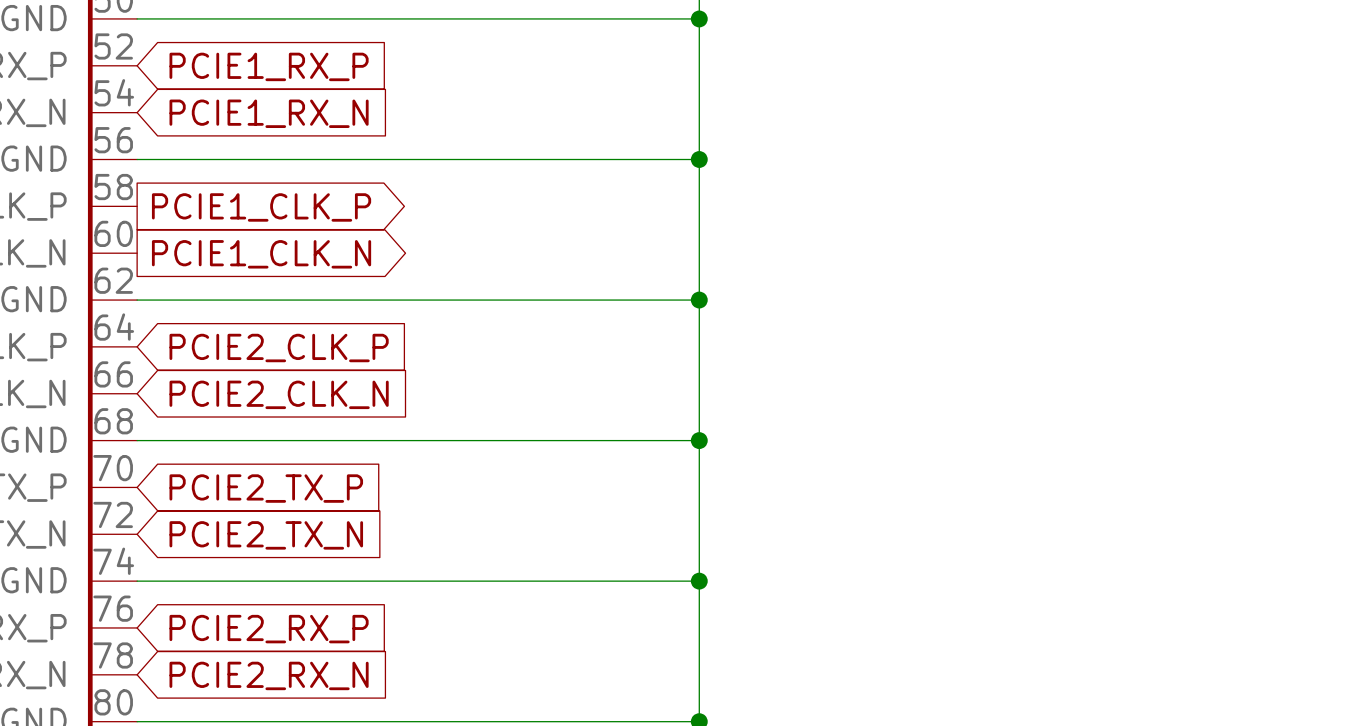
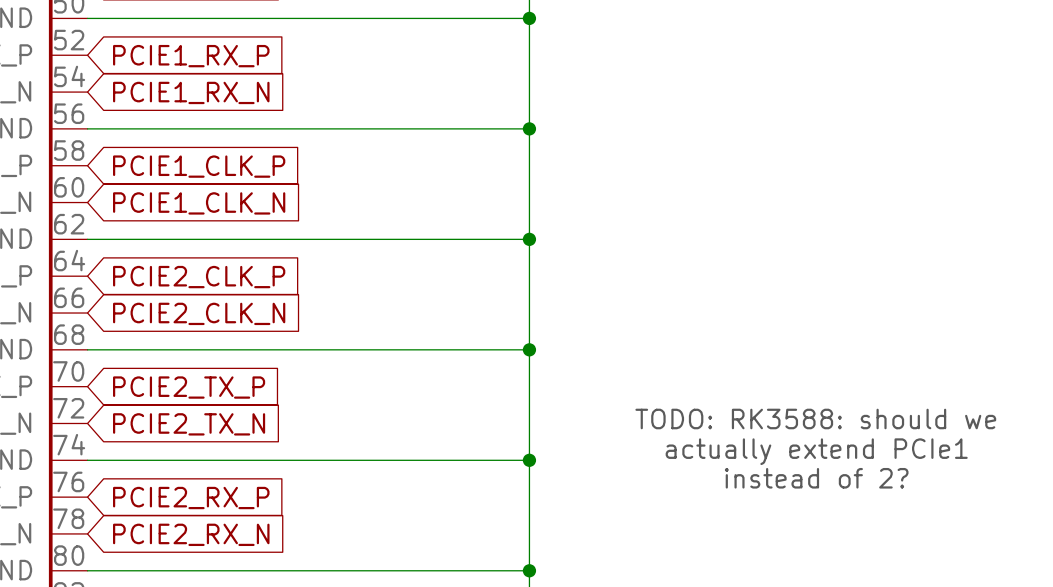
global label shape: output (261, 207) -> input (199, 166)
global label shape: output (261, 254) -> input (199, 203)
text: none -> TODO: RK3588: should we (815, 418)
text: none -> actually extend PCIe1 (816, 451)
text: none -> instead of 2? (816, 478)

